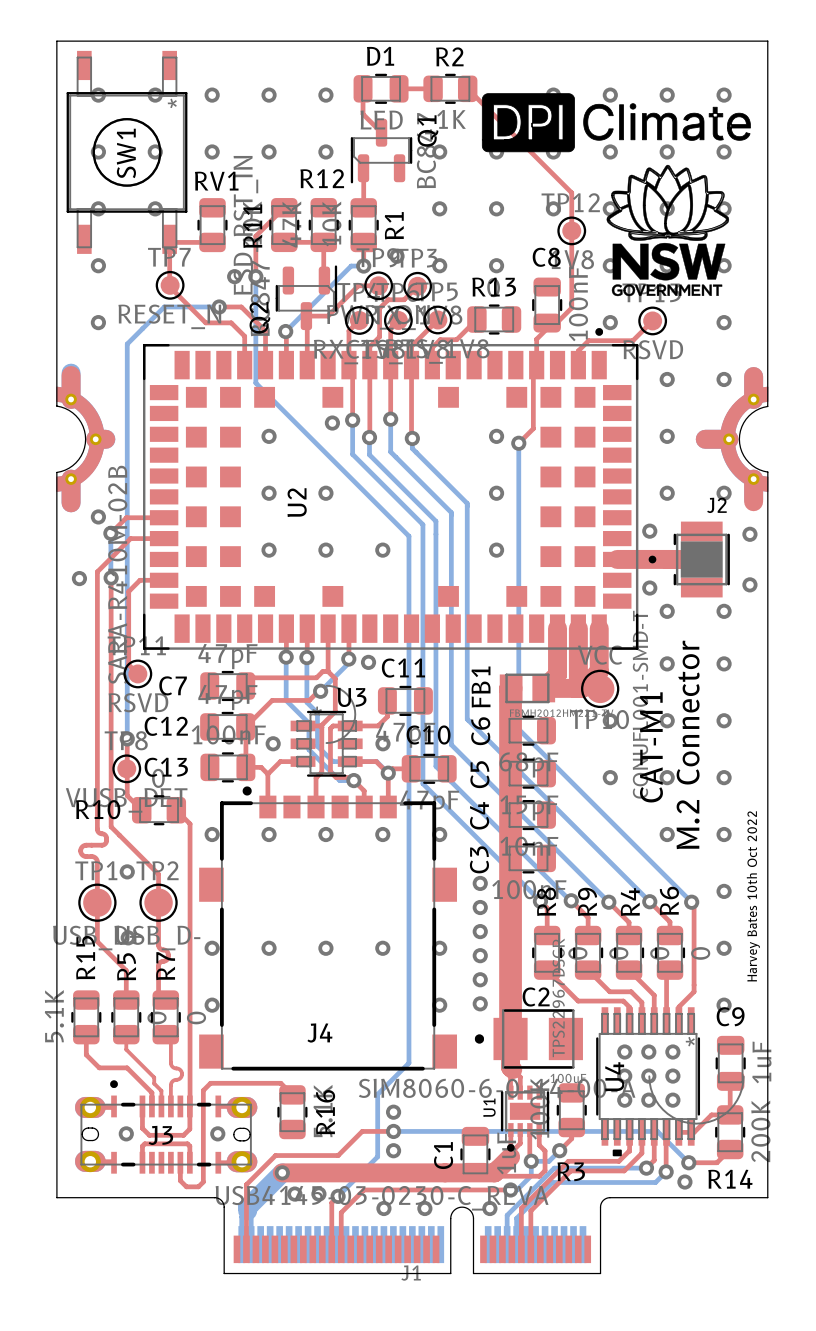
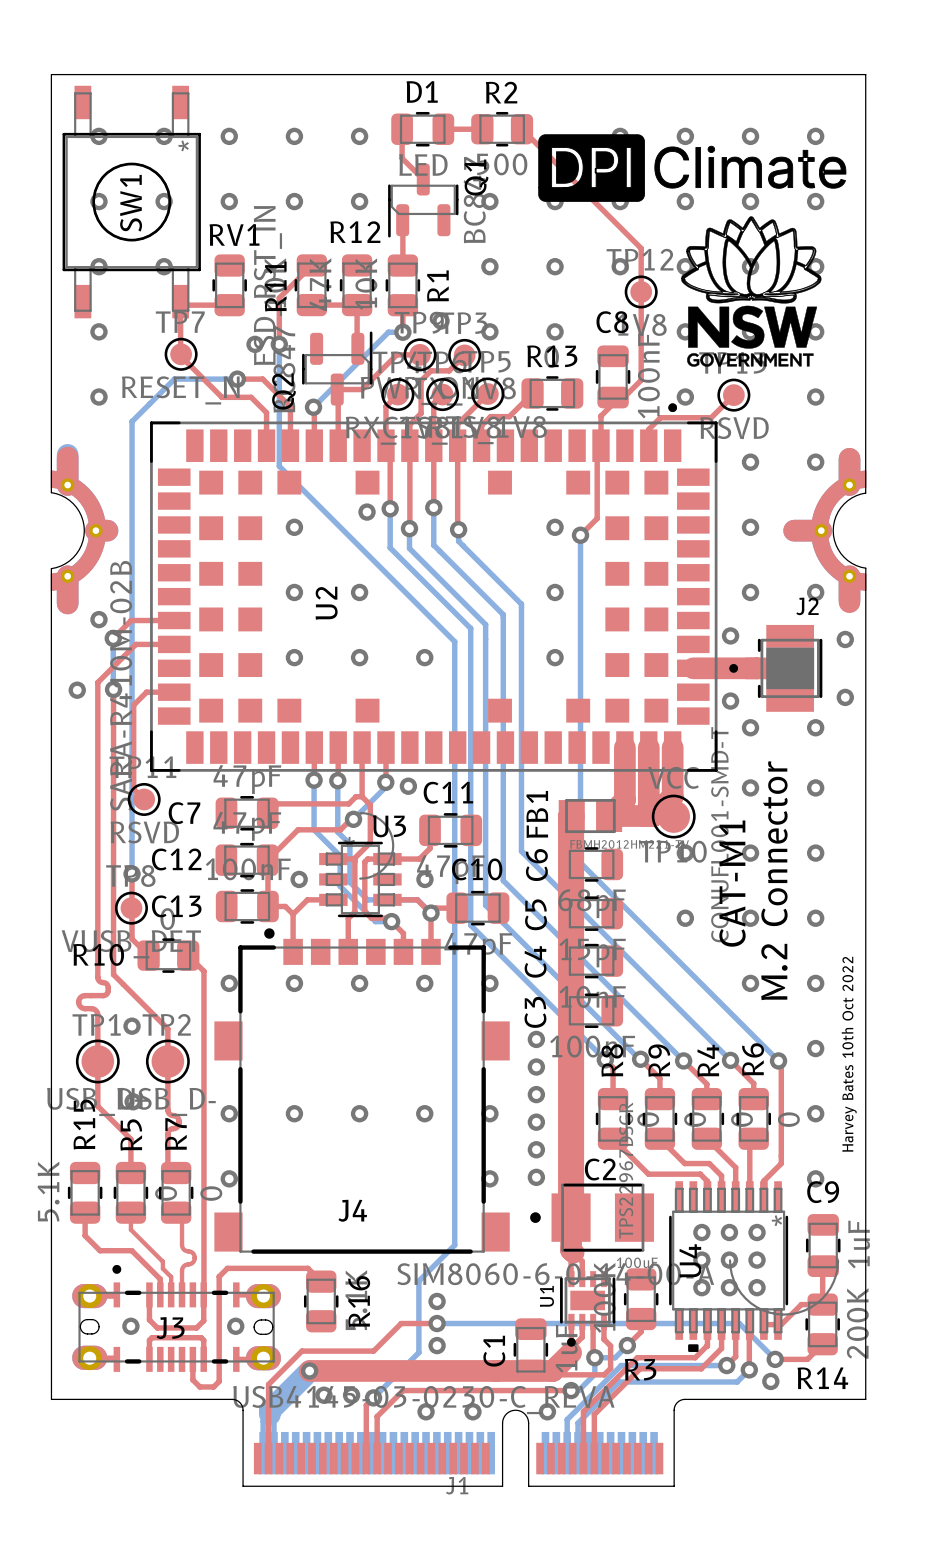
R2 value: 1K (451, 119) -> 500 (502, 164)

